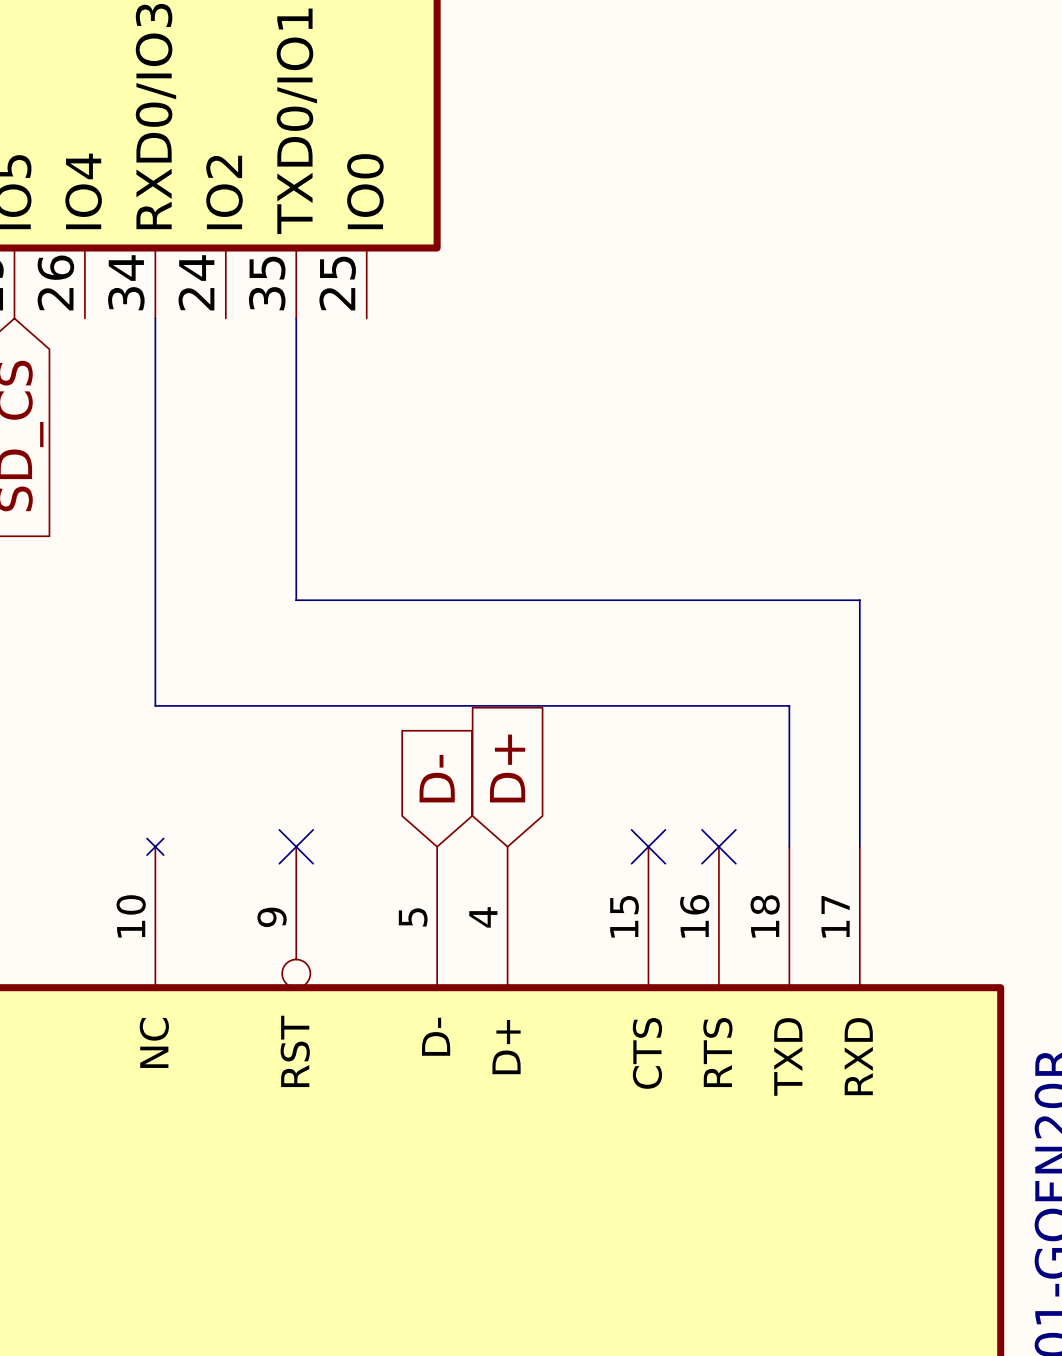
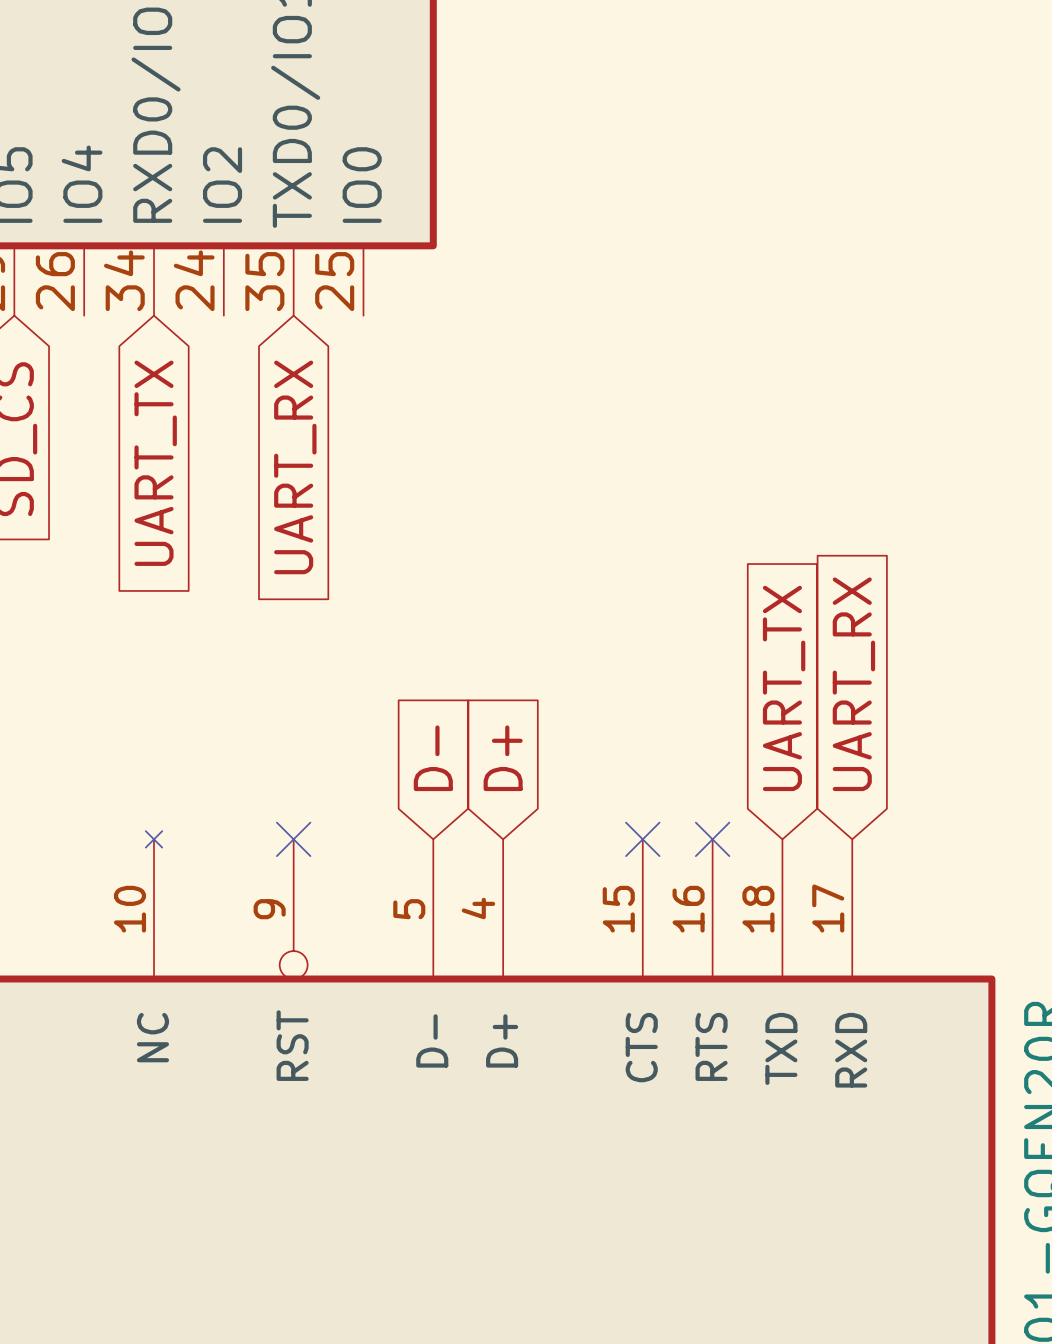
wire: (155, 318) (155, 705) (789, 705) (789, 846) -> none
wire: (296, 318) (296, 600) (859, 600) (859, 846) -> none
global label: none -> UART_TX (155, 463)
global label: none -> UART_RX (295, 467)
global label: none -> UART_RX (853, 684)
global label: none -> UART_TX (784, 688)

